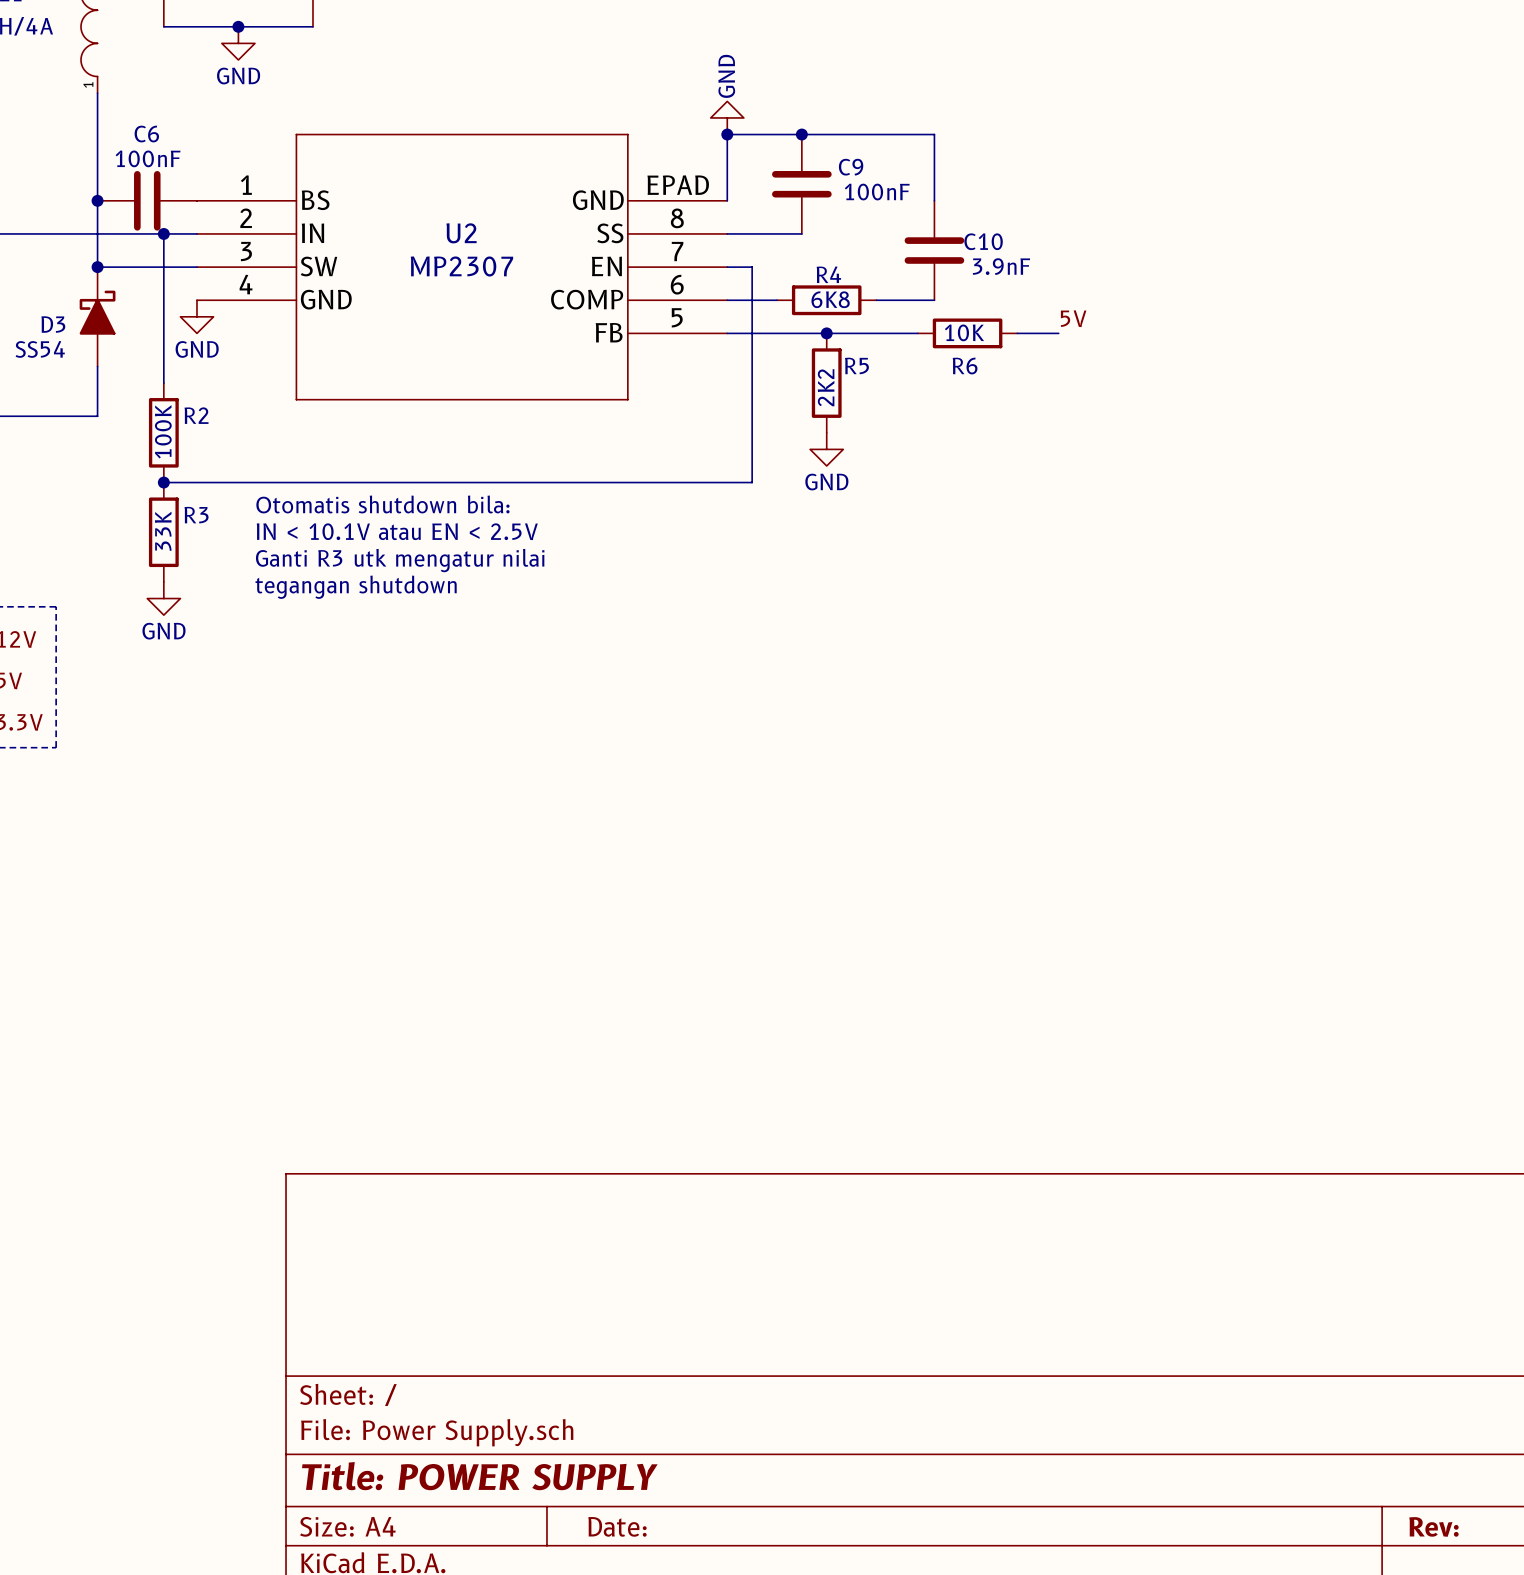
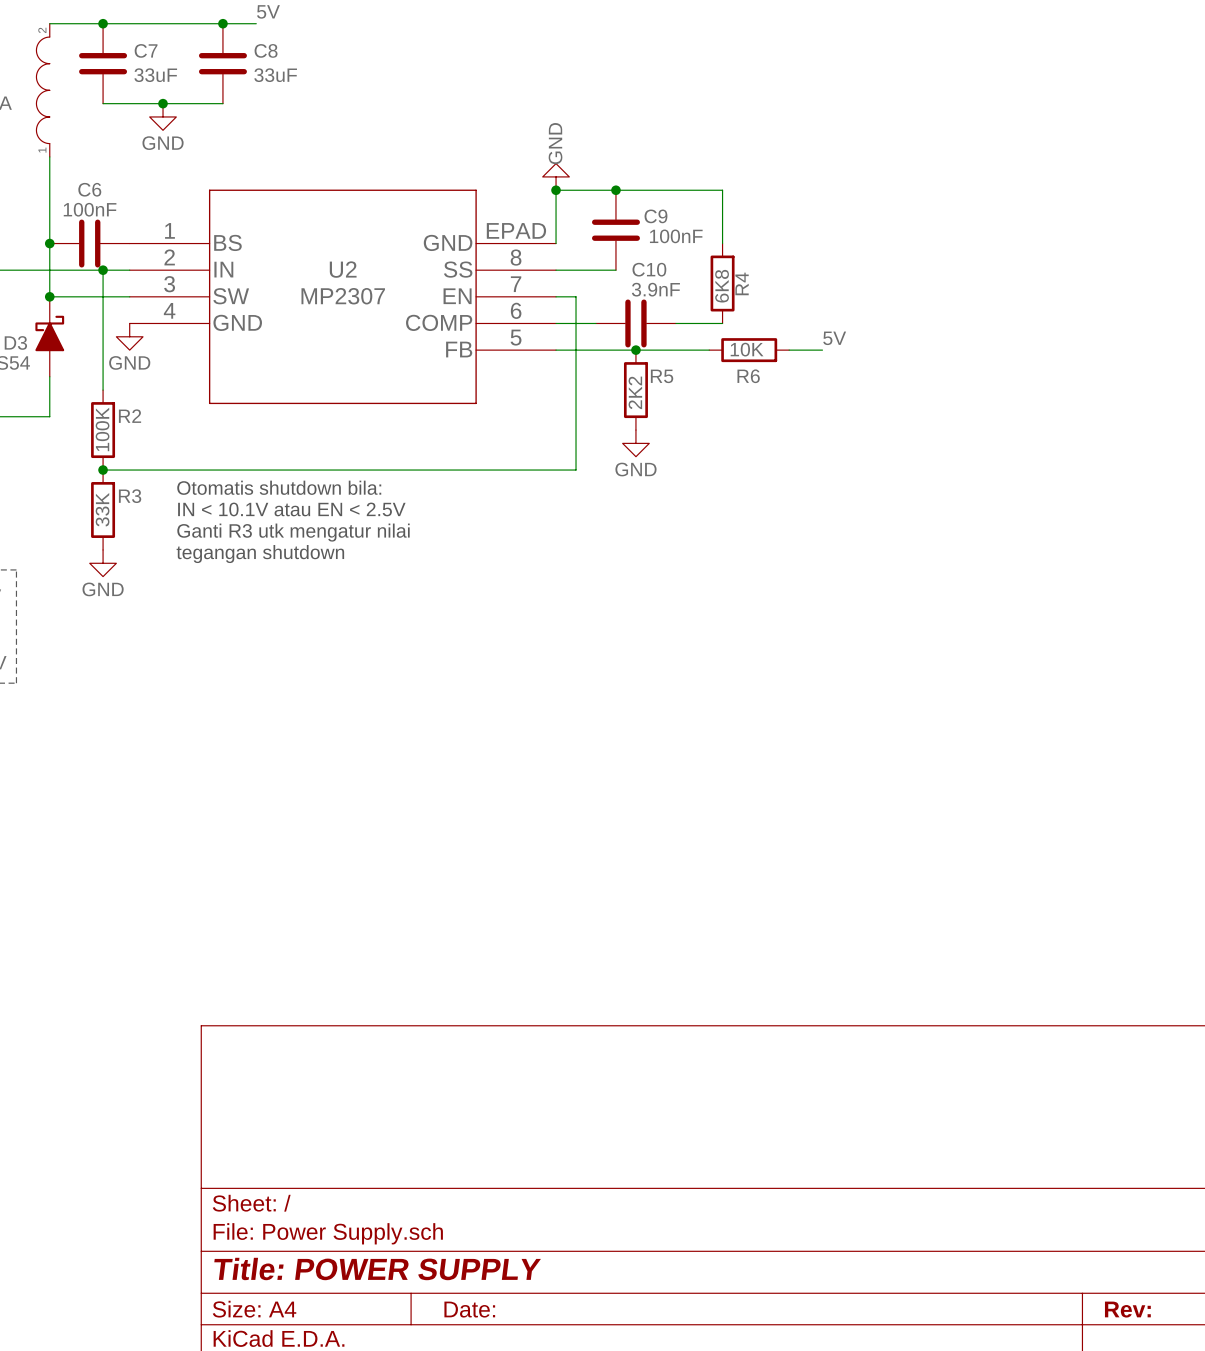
C10 name position: C10 (983, 241) -> C10 (649, 269)
C10 rotation: 0° (934, 250) -> 90° clockwise (635, 323)
C10 position: (934, 250) -> (635, 323)
C10 value position: 3.9nF (1001, 266) -> 3.9nF (655, 289)
R4 rotation: 0° (826, 300) -> 90° clockwise (722, 283)
R4 position: (826, 300) -> (722, 283)

